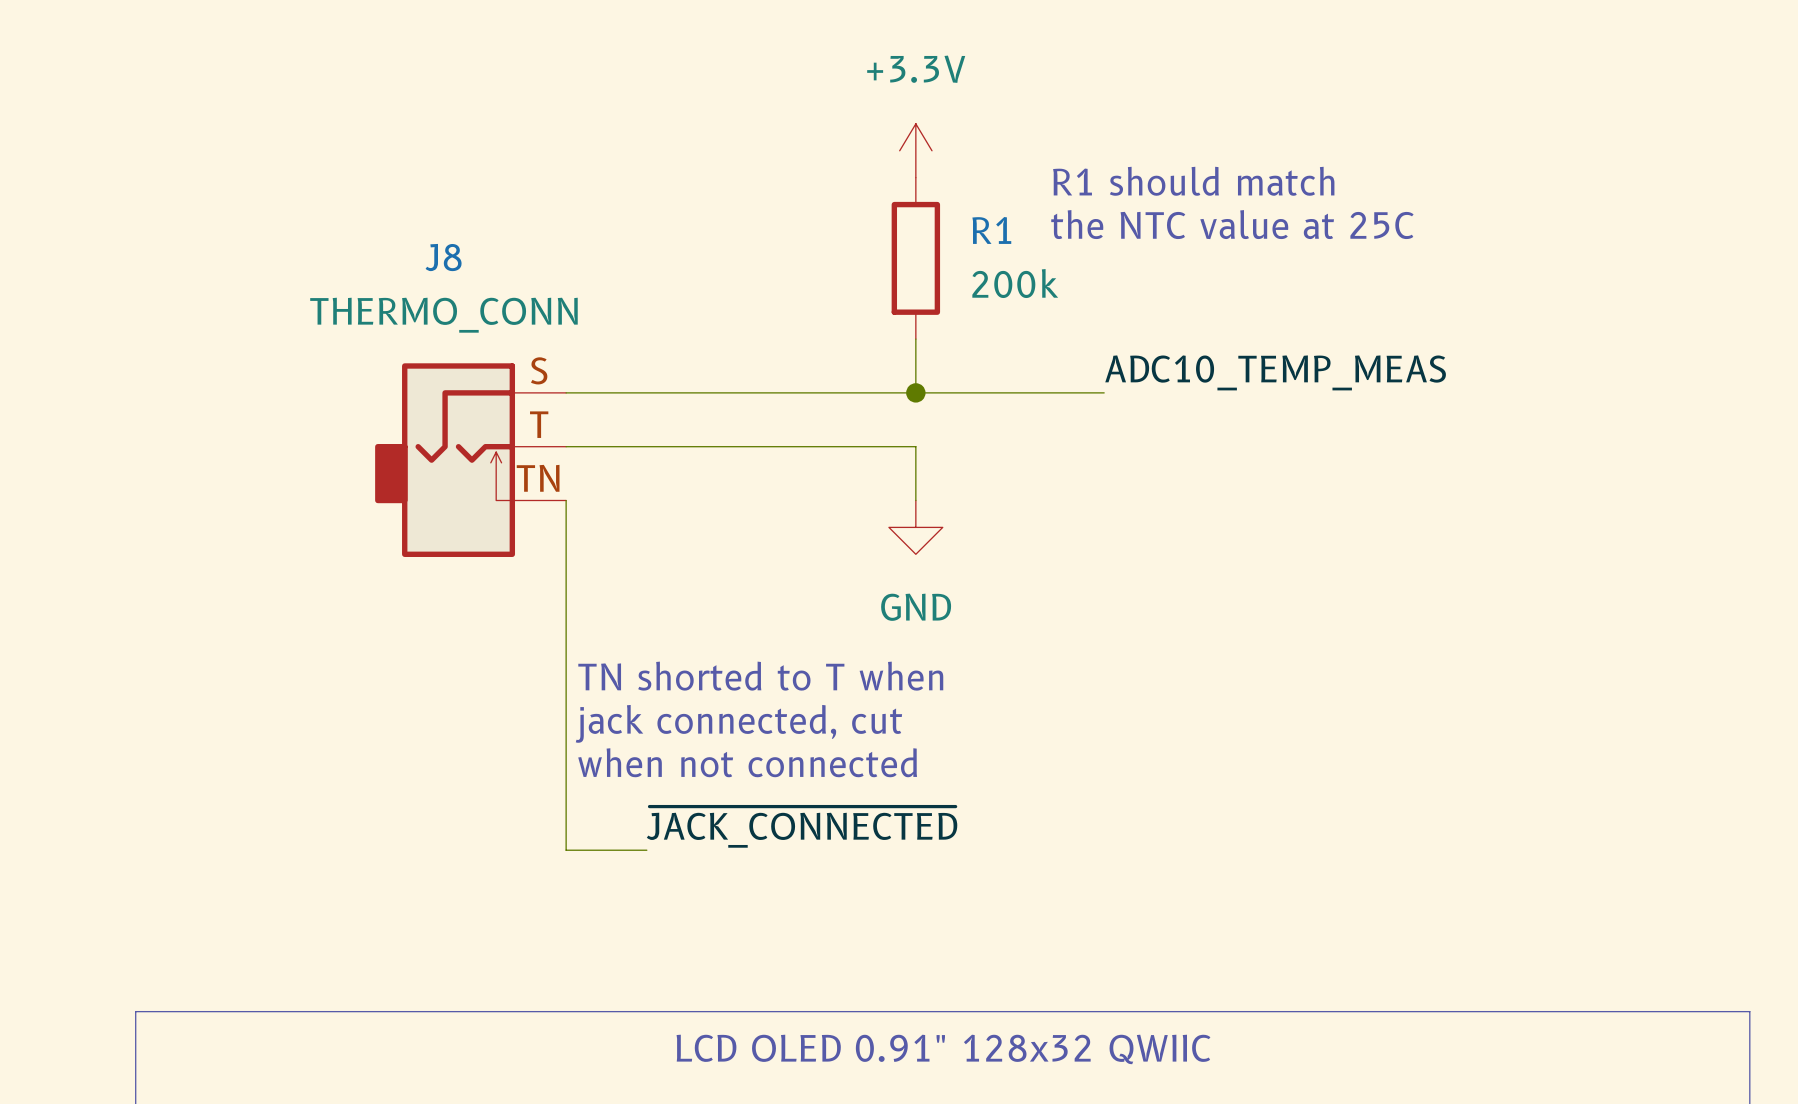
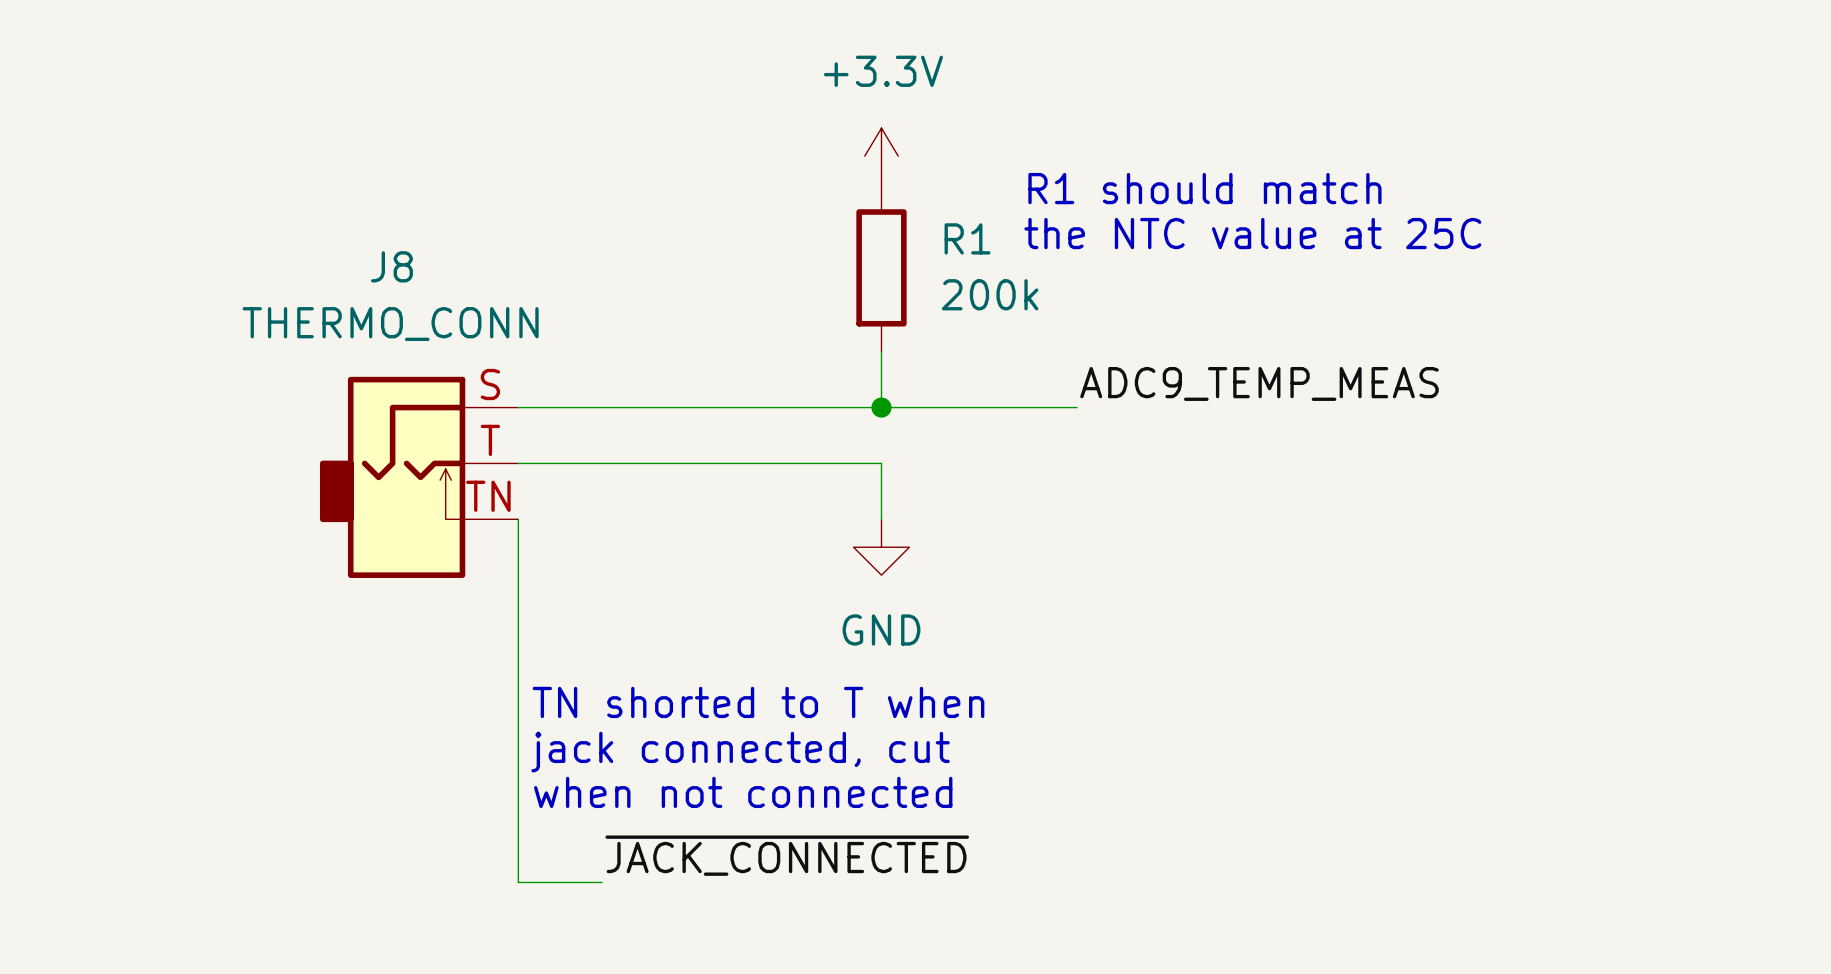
label: ADC10_TEMP_MEAS (1275, 372) -> ADC9_TEMP_MEAS (1259, 383)

